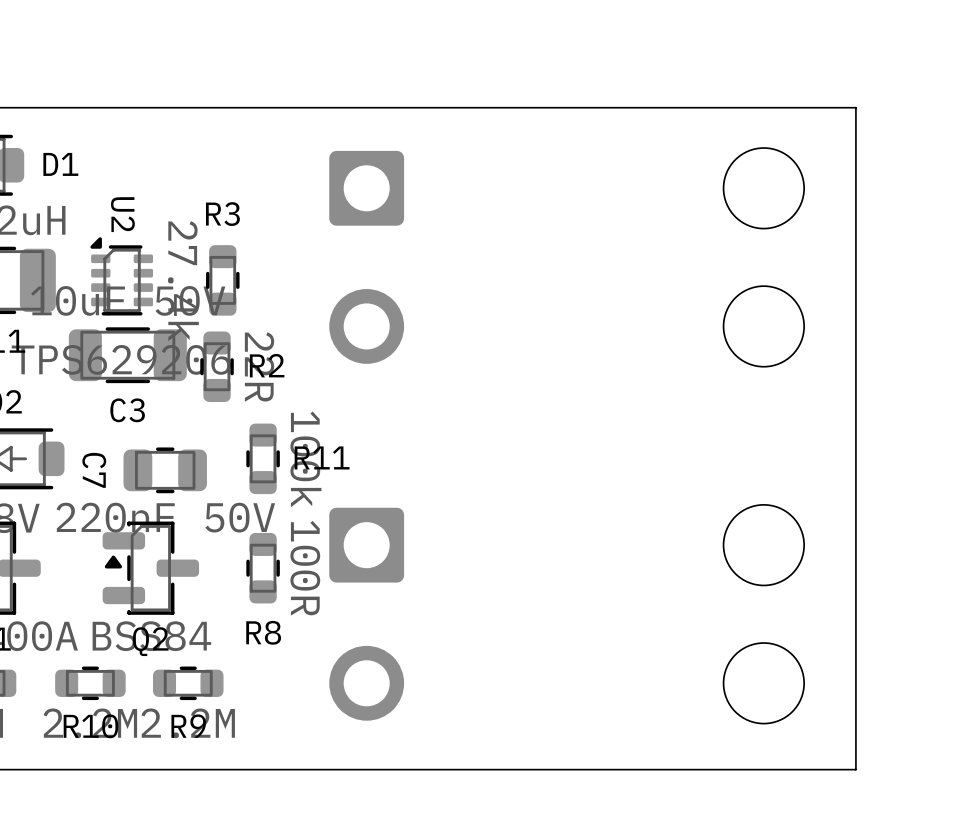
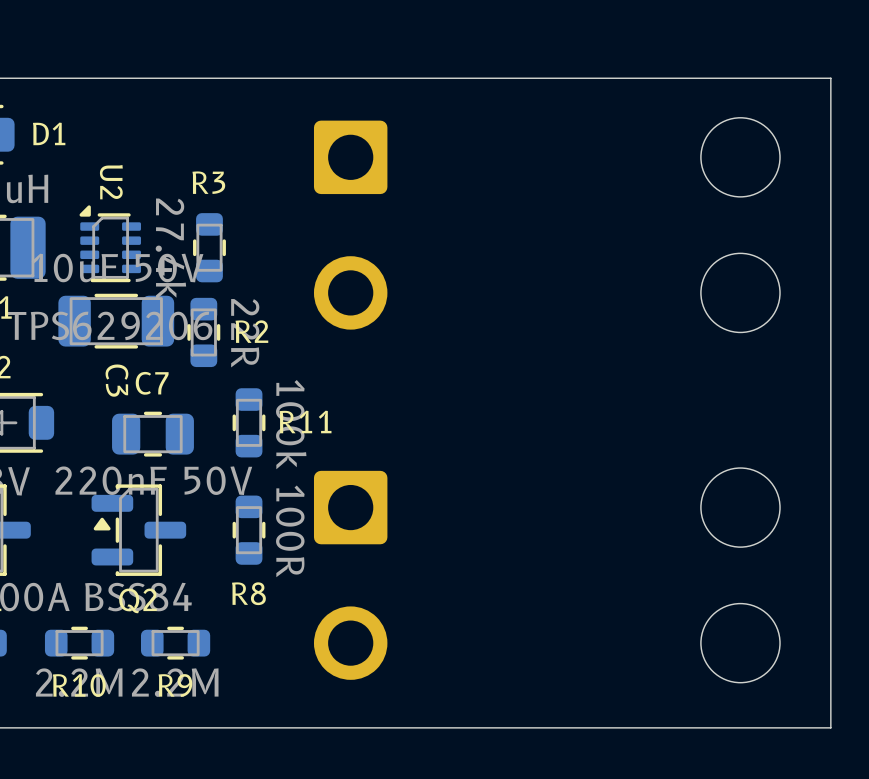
C3 name rotation: 0° (127, 410) -> 90° clockwise (116, 380)
C7 name rotation: 0° (94, 470) -> 90° counterclockwise (152, 383)
C7 name position: C7 (94, 470) -> C7 (152, 383)

